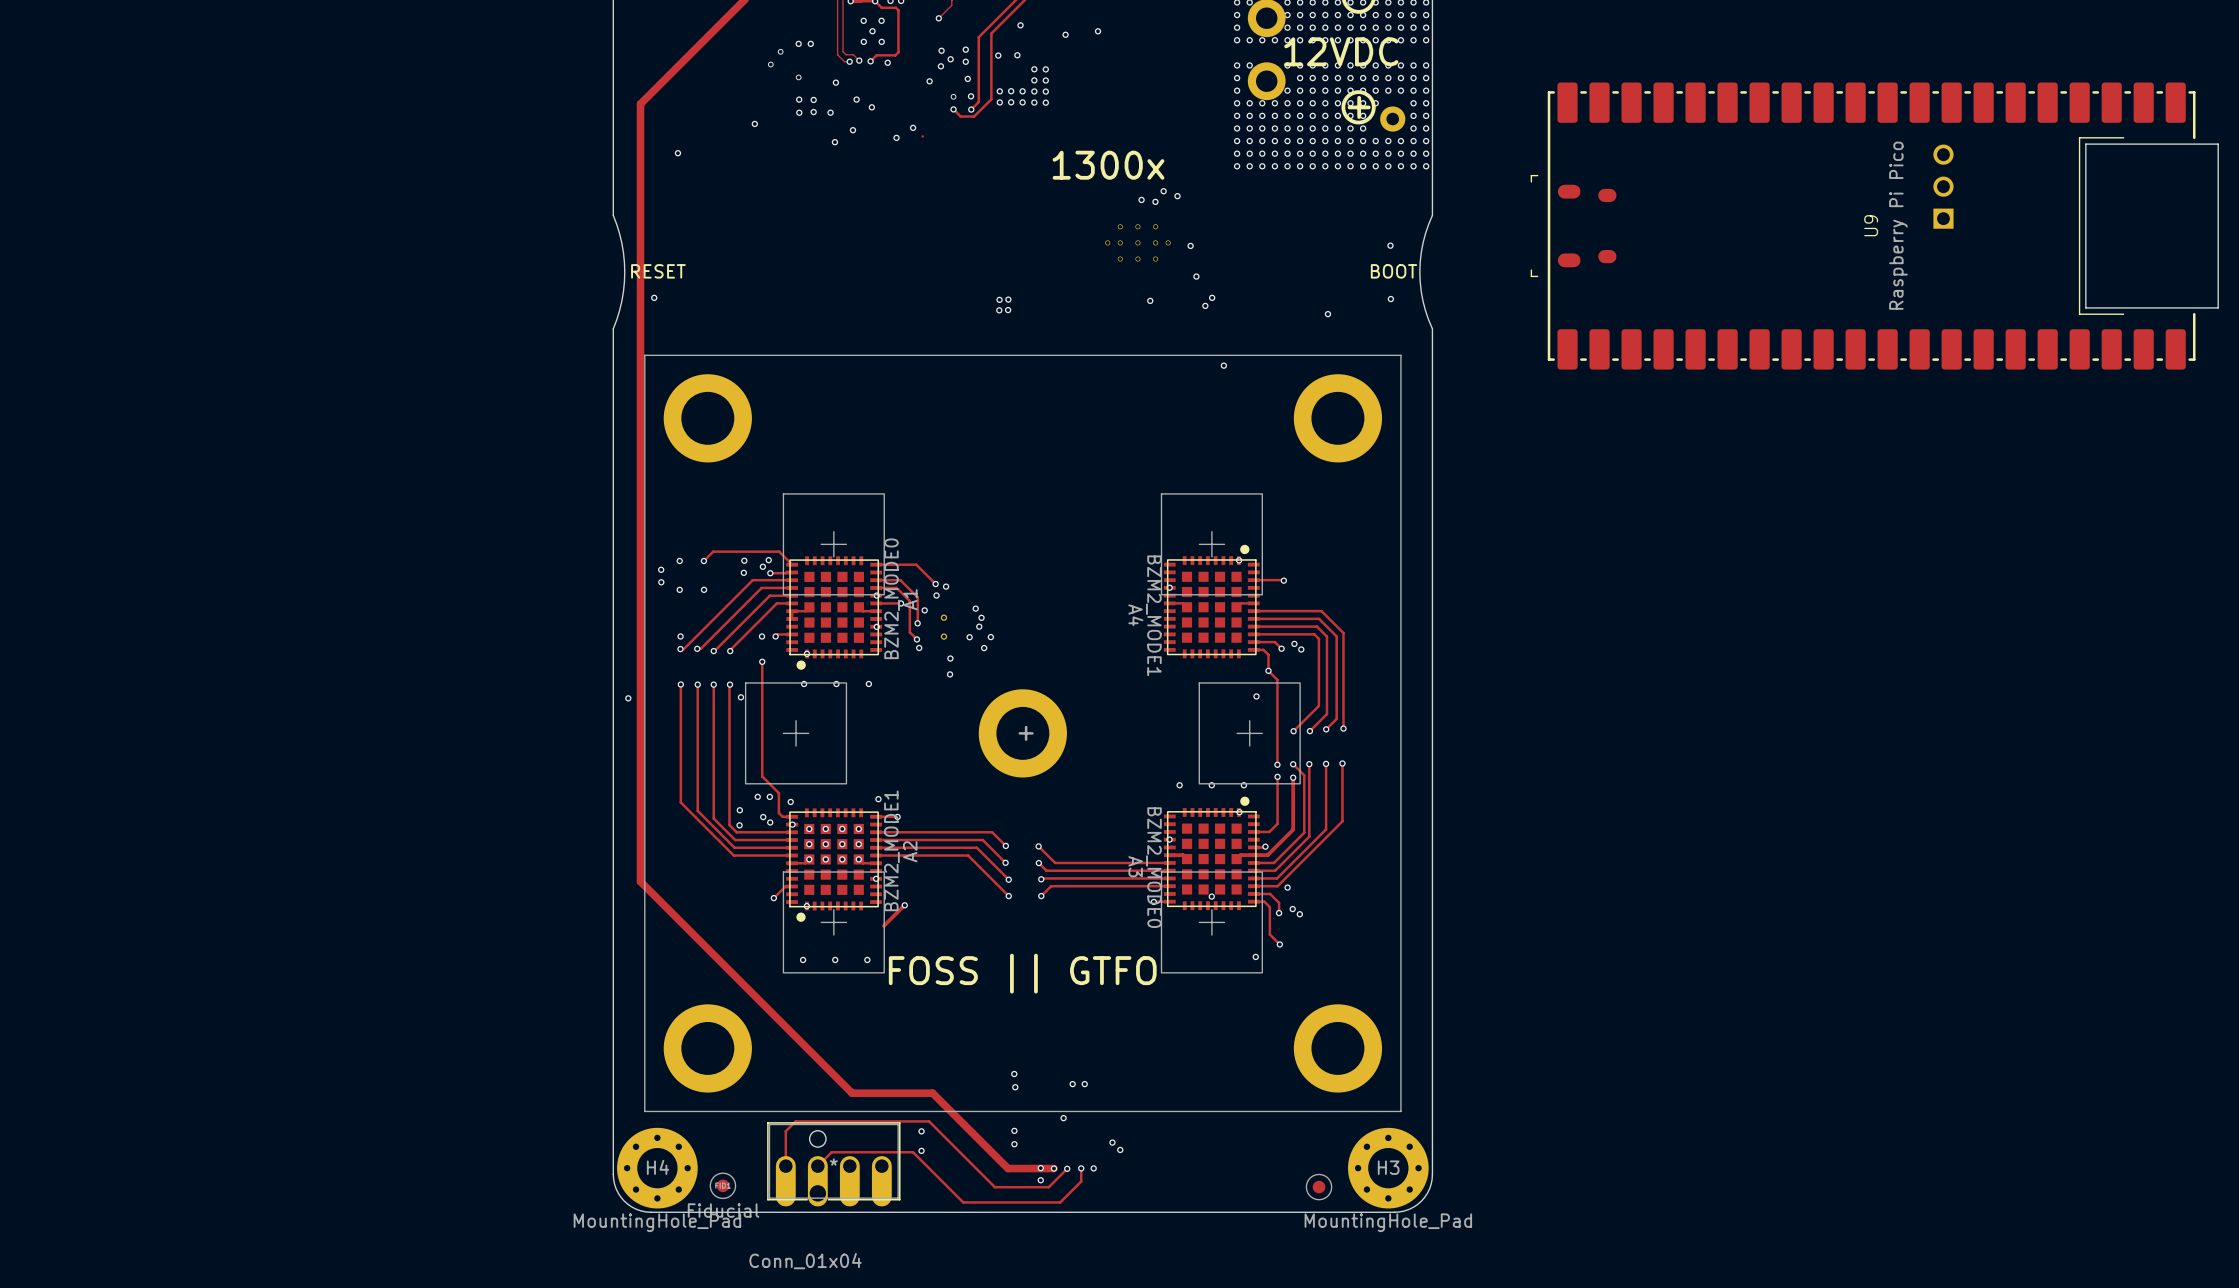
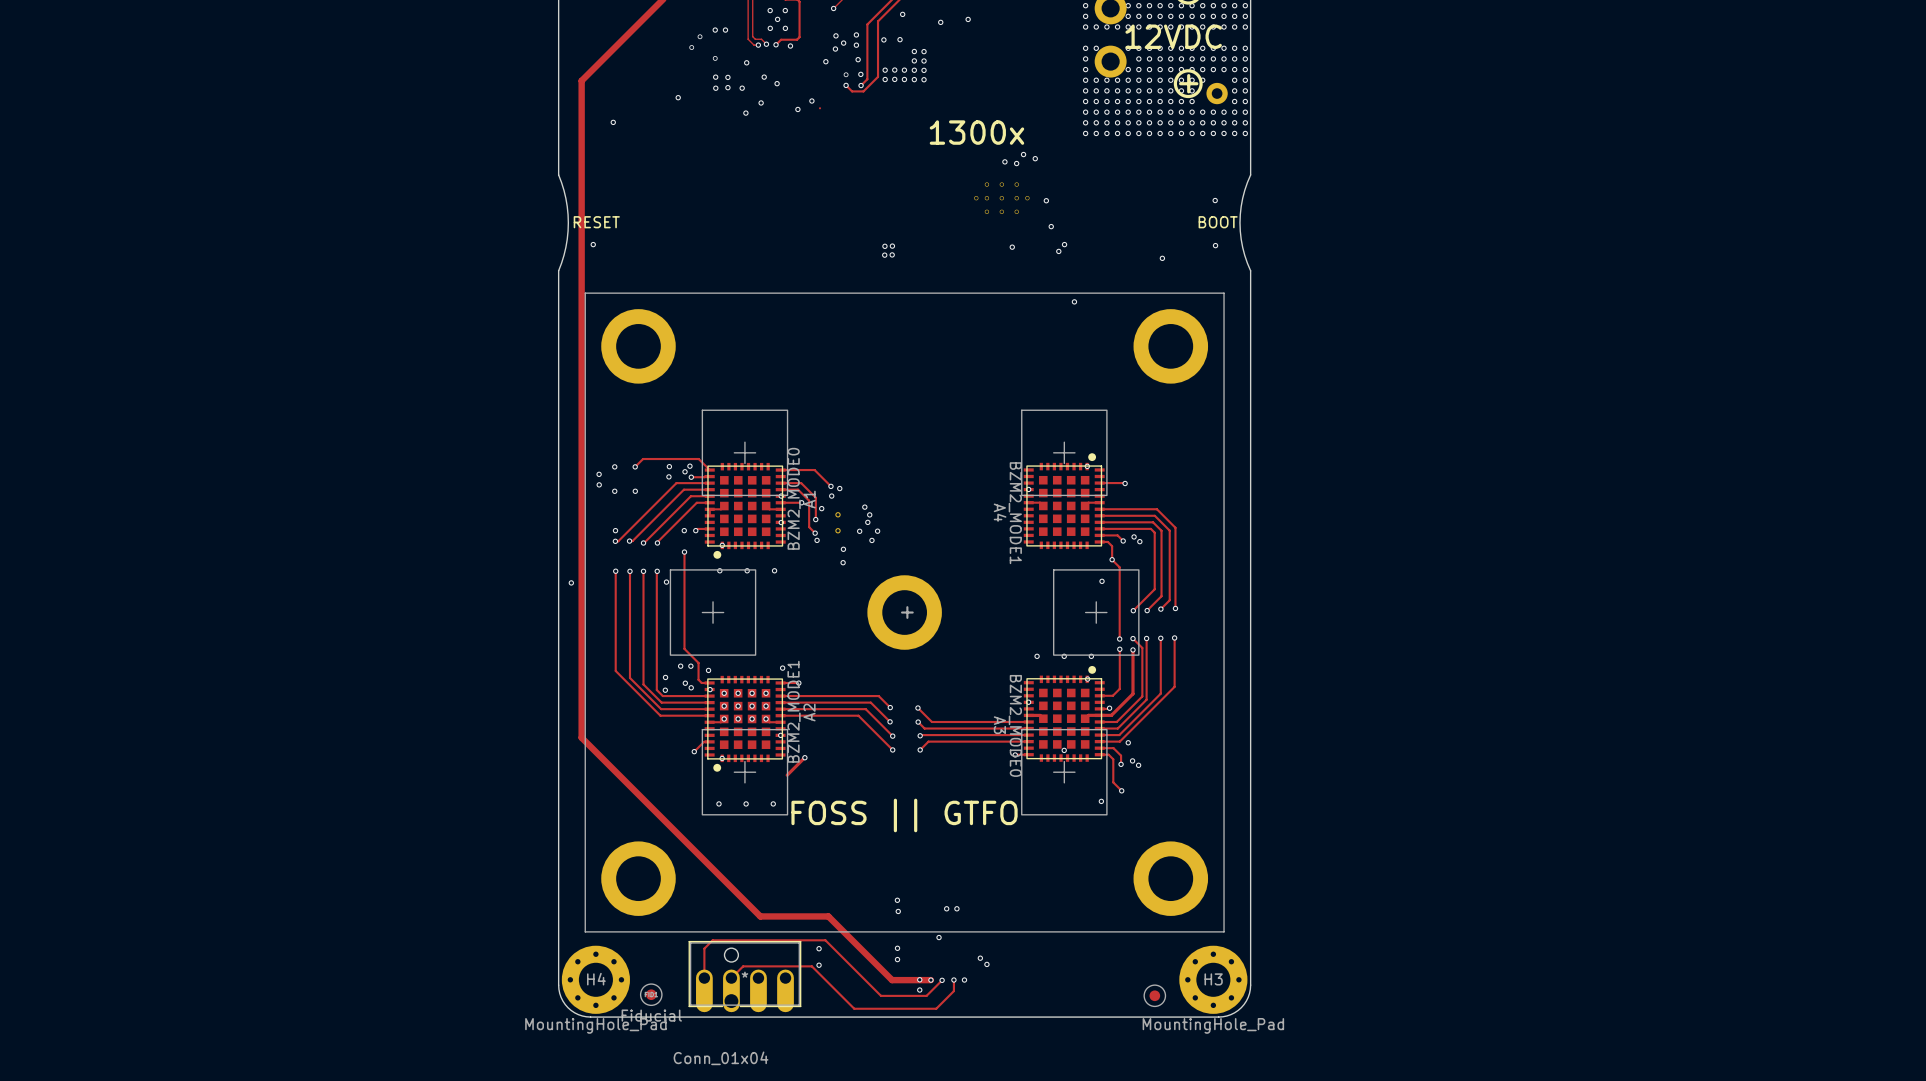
U9: Raspberry Pi Pico (1874, 226) -> none

